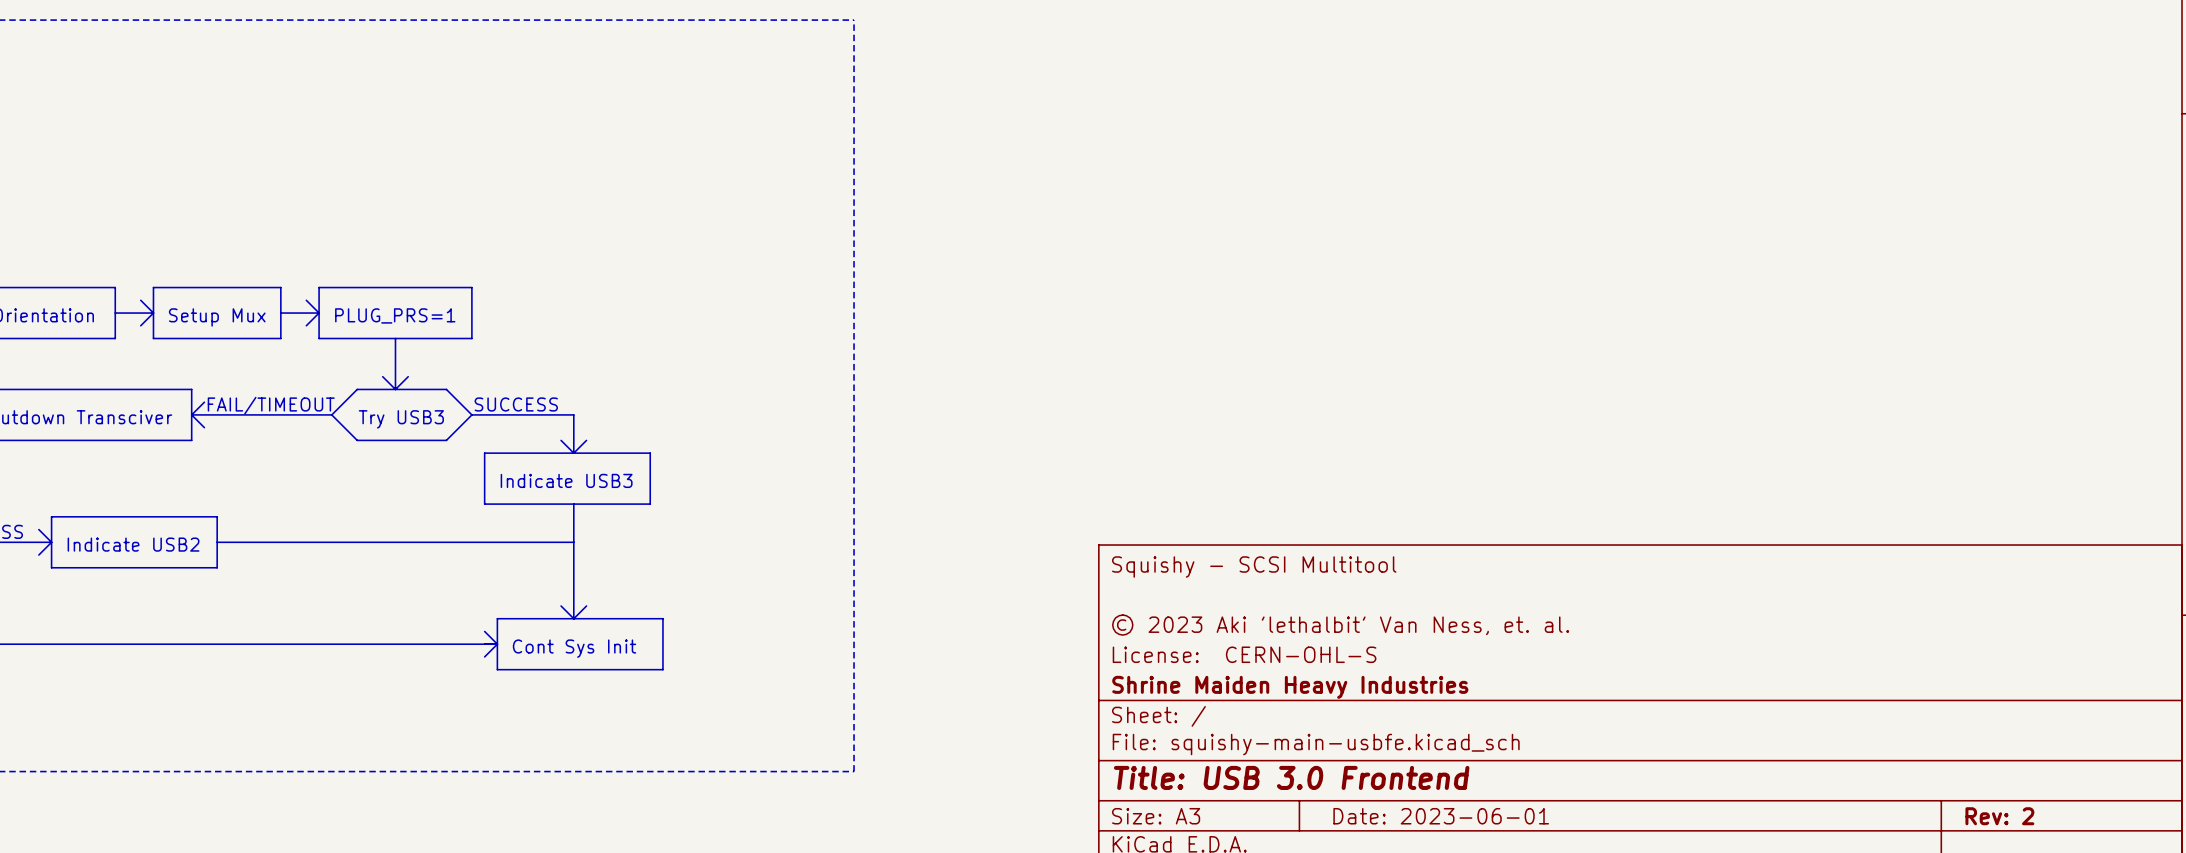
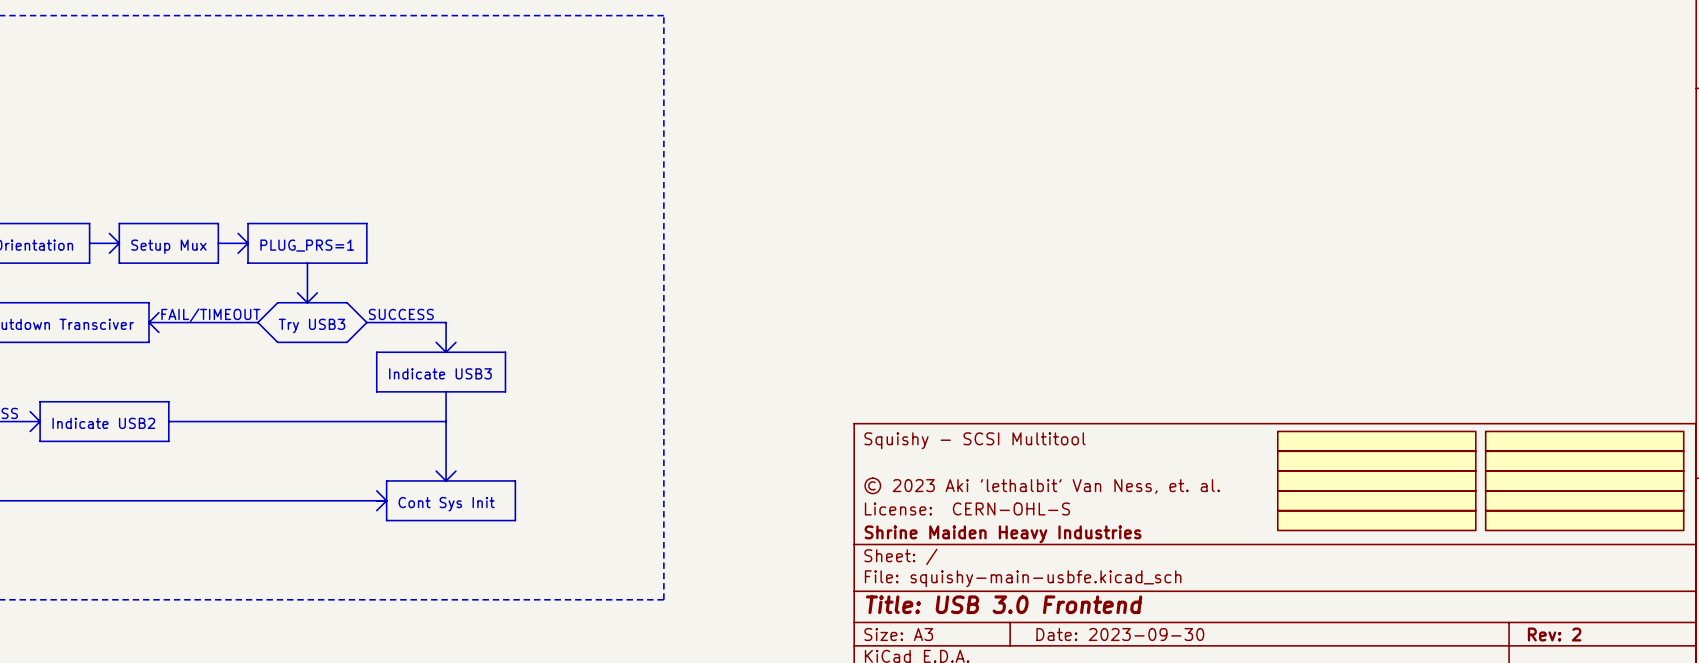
part: none -> (1376, 480)
part: none -> (1584, 480)
title block: Date: 2023-06-01 (1441, 816) -> Date: 2023-09-30 (1120, 634)

